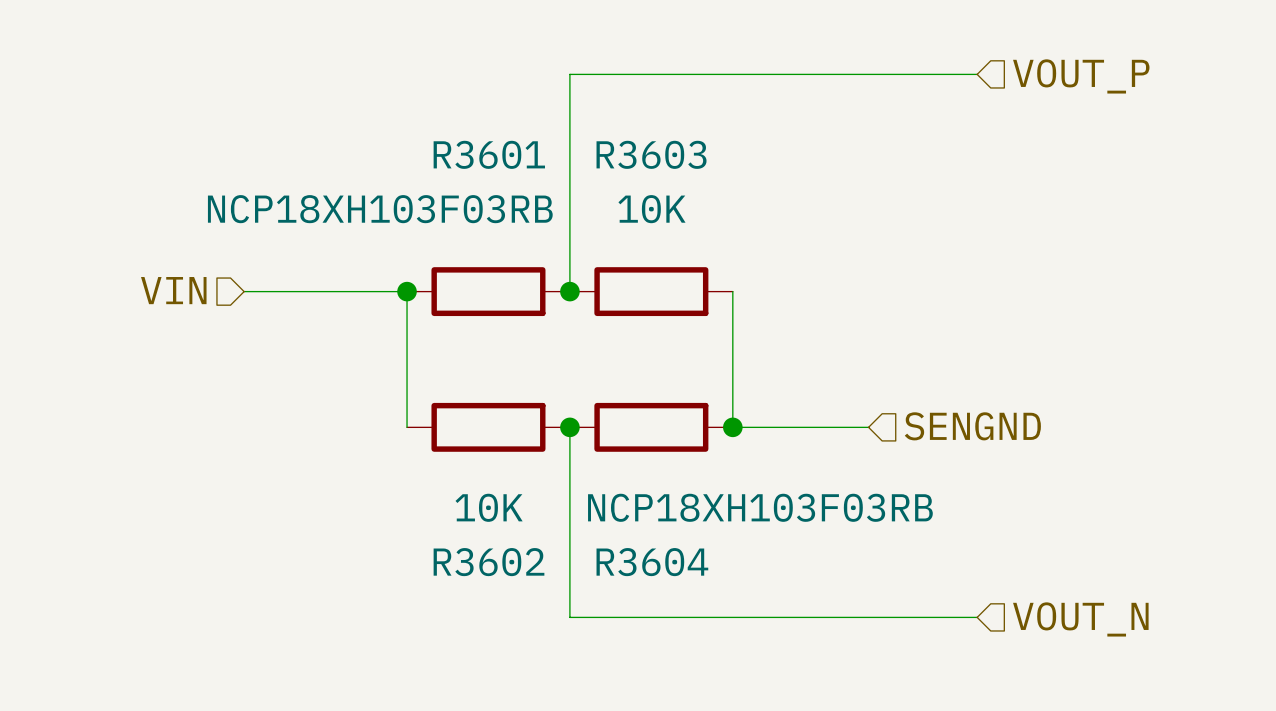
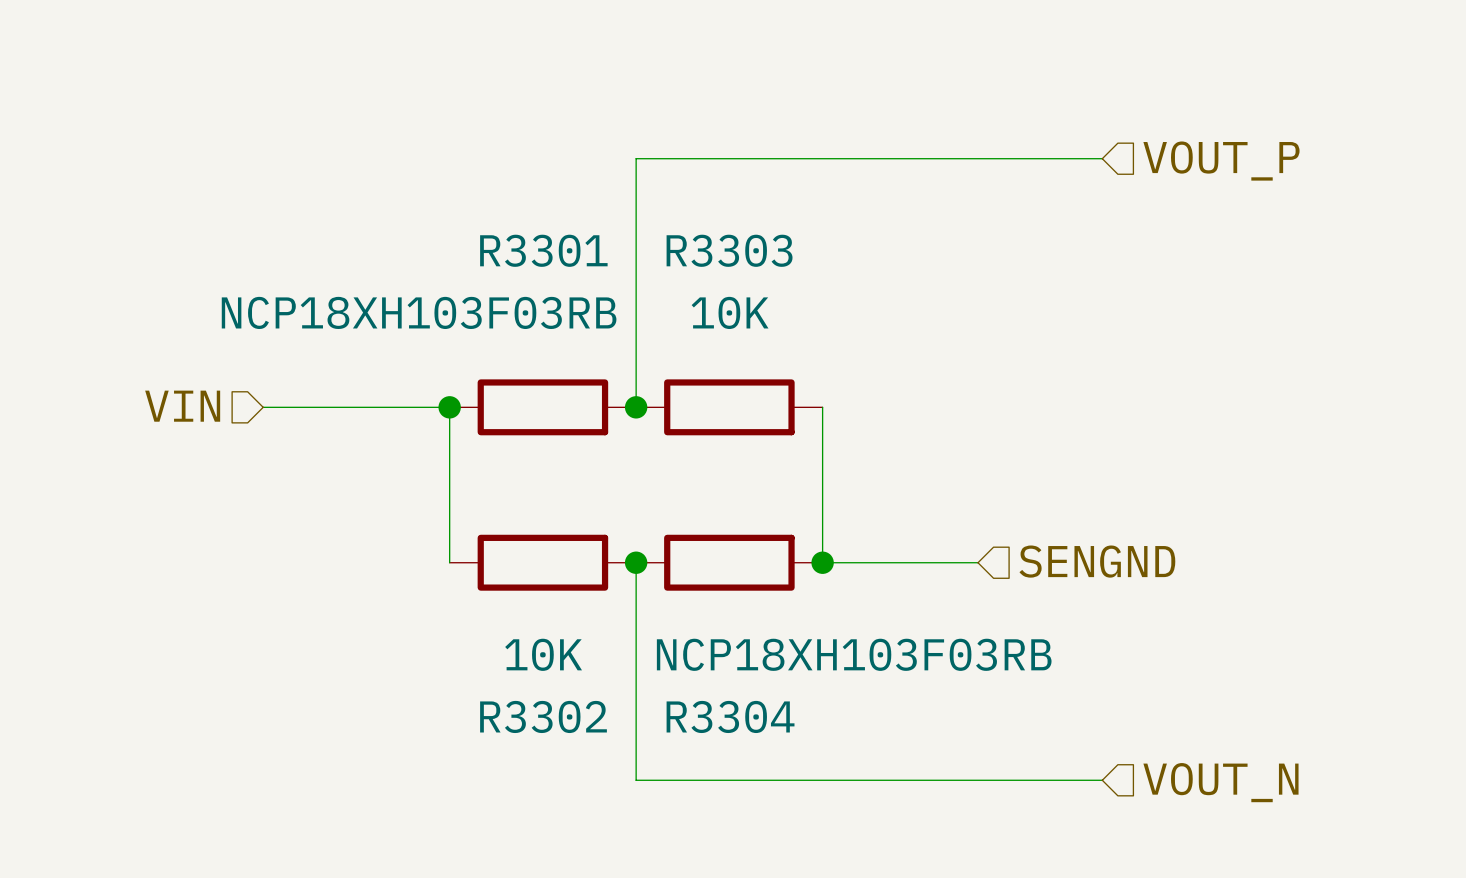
R3601 name: R3601 (489, 154) -> R3301 (543, 250)
R3603 name: R3603 (651, 154) -> R3303 (729, 250)
R3602 name: R3602 (488, 562) -> R3302 (543, 716)
R3604 name: R3604 (652, 562) -> R3304 (730, 716)

